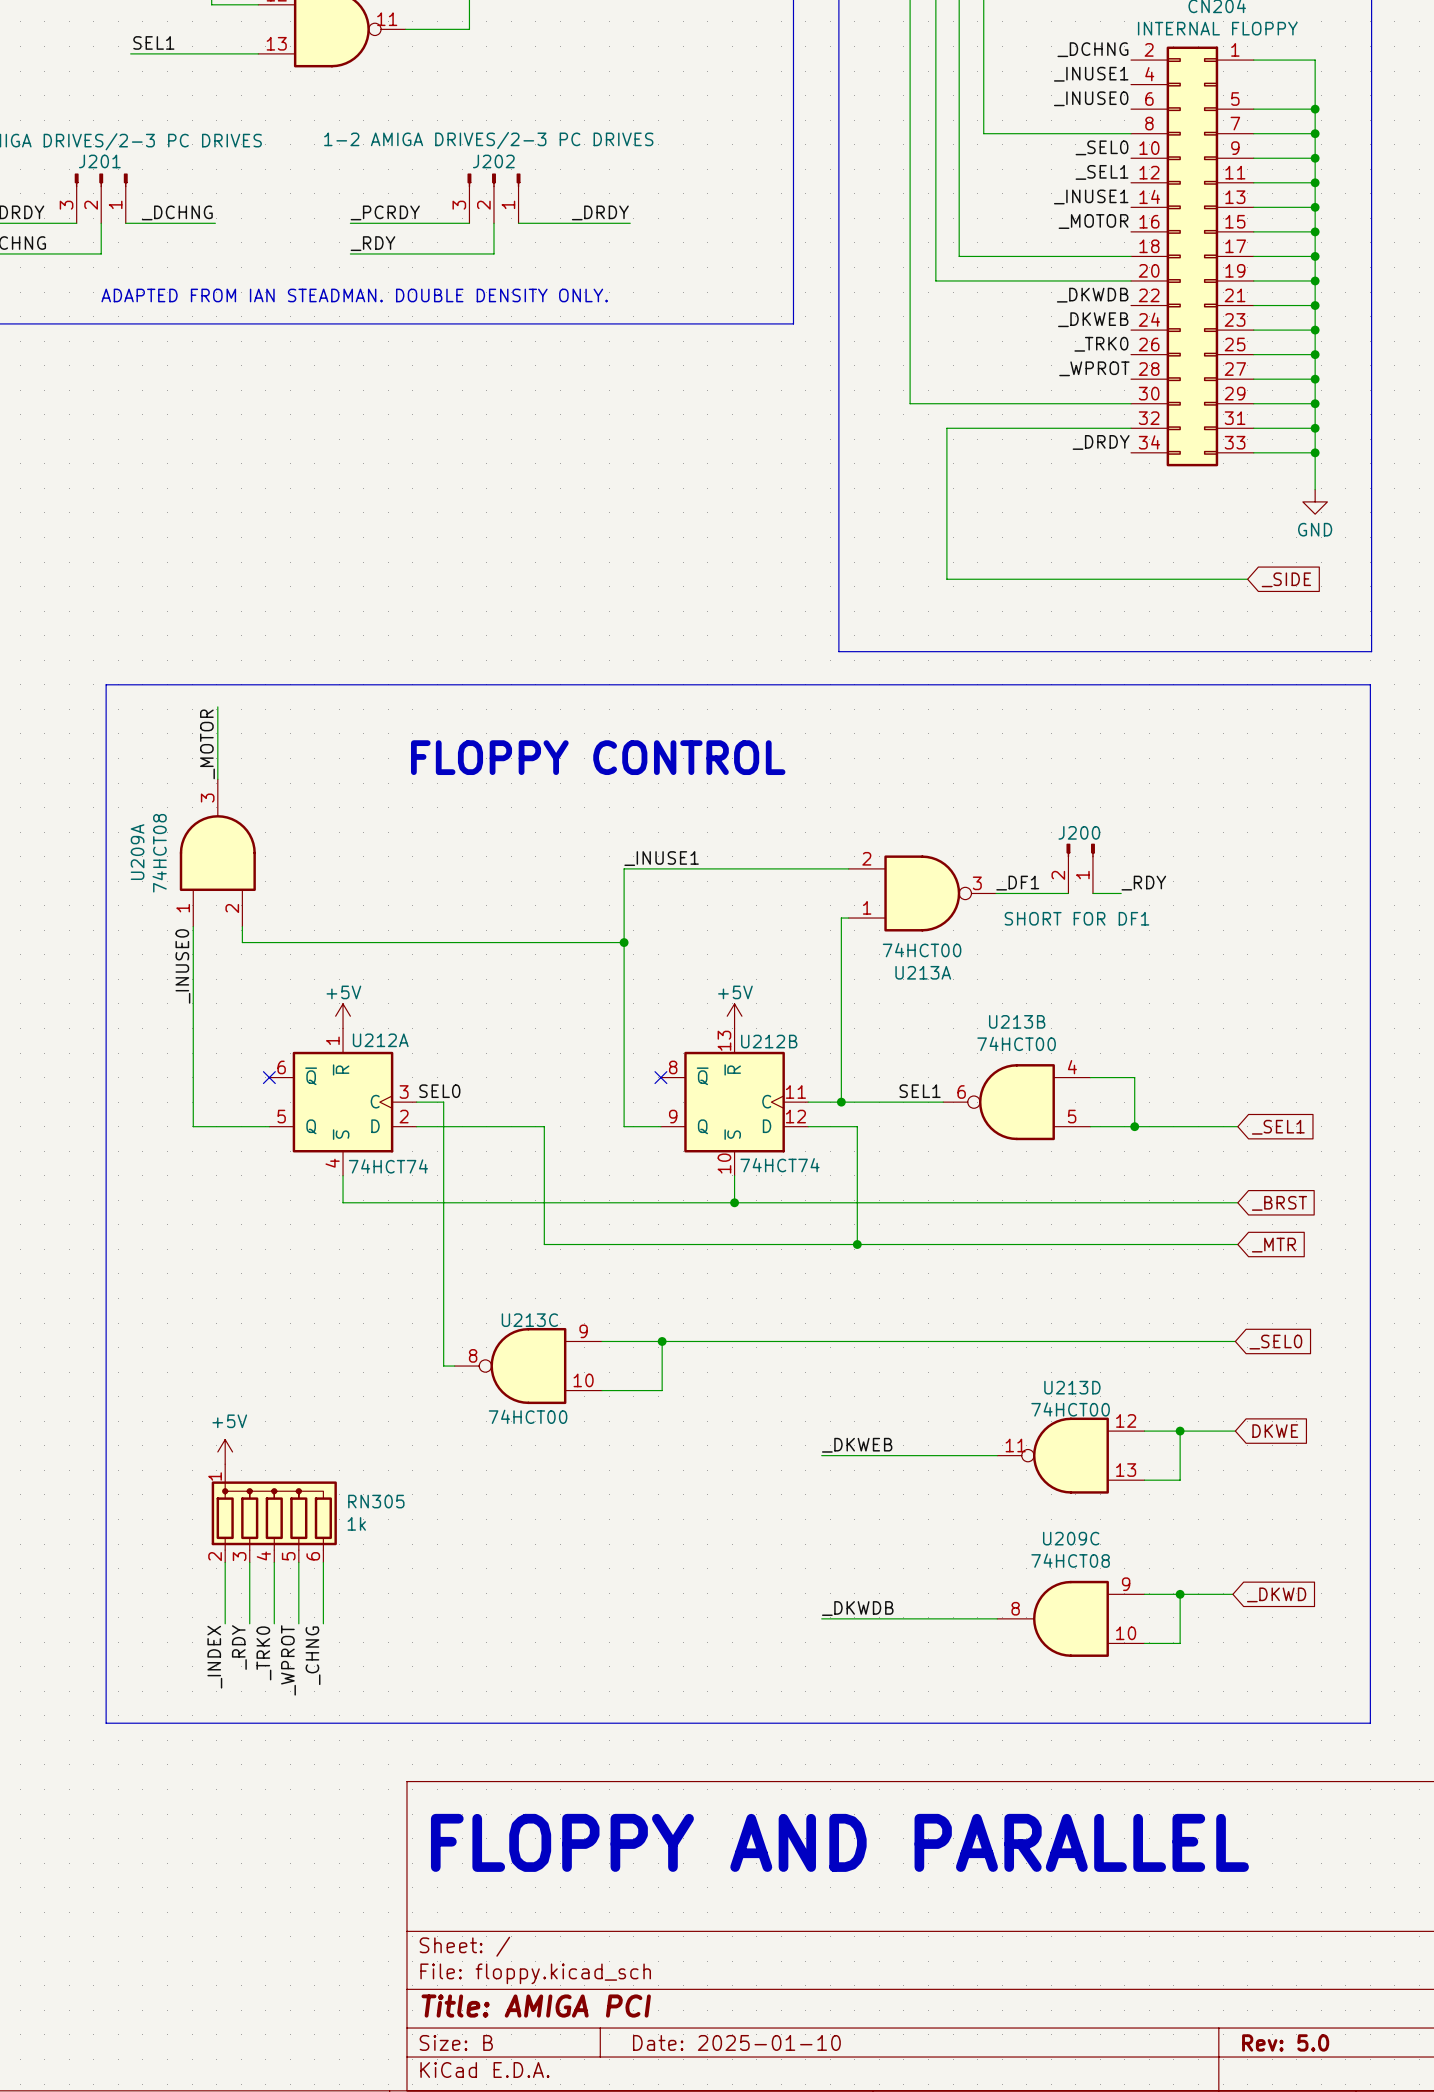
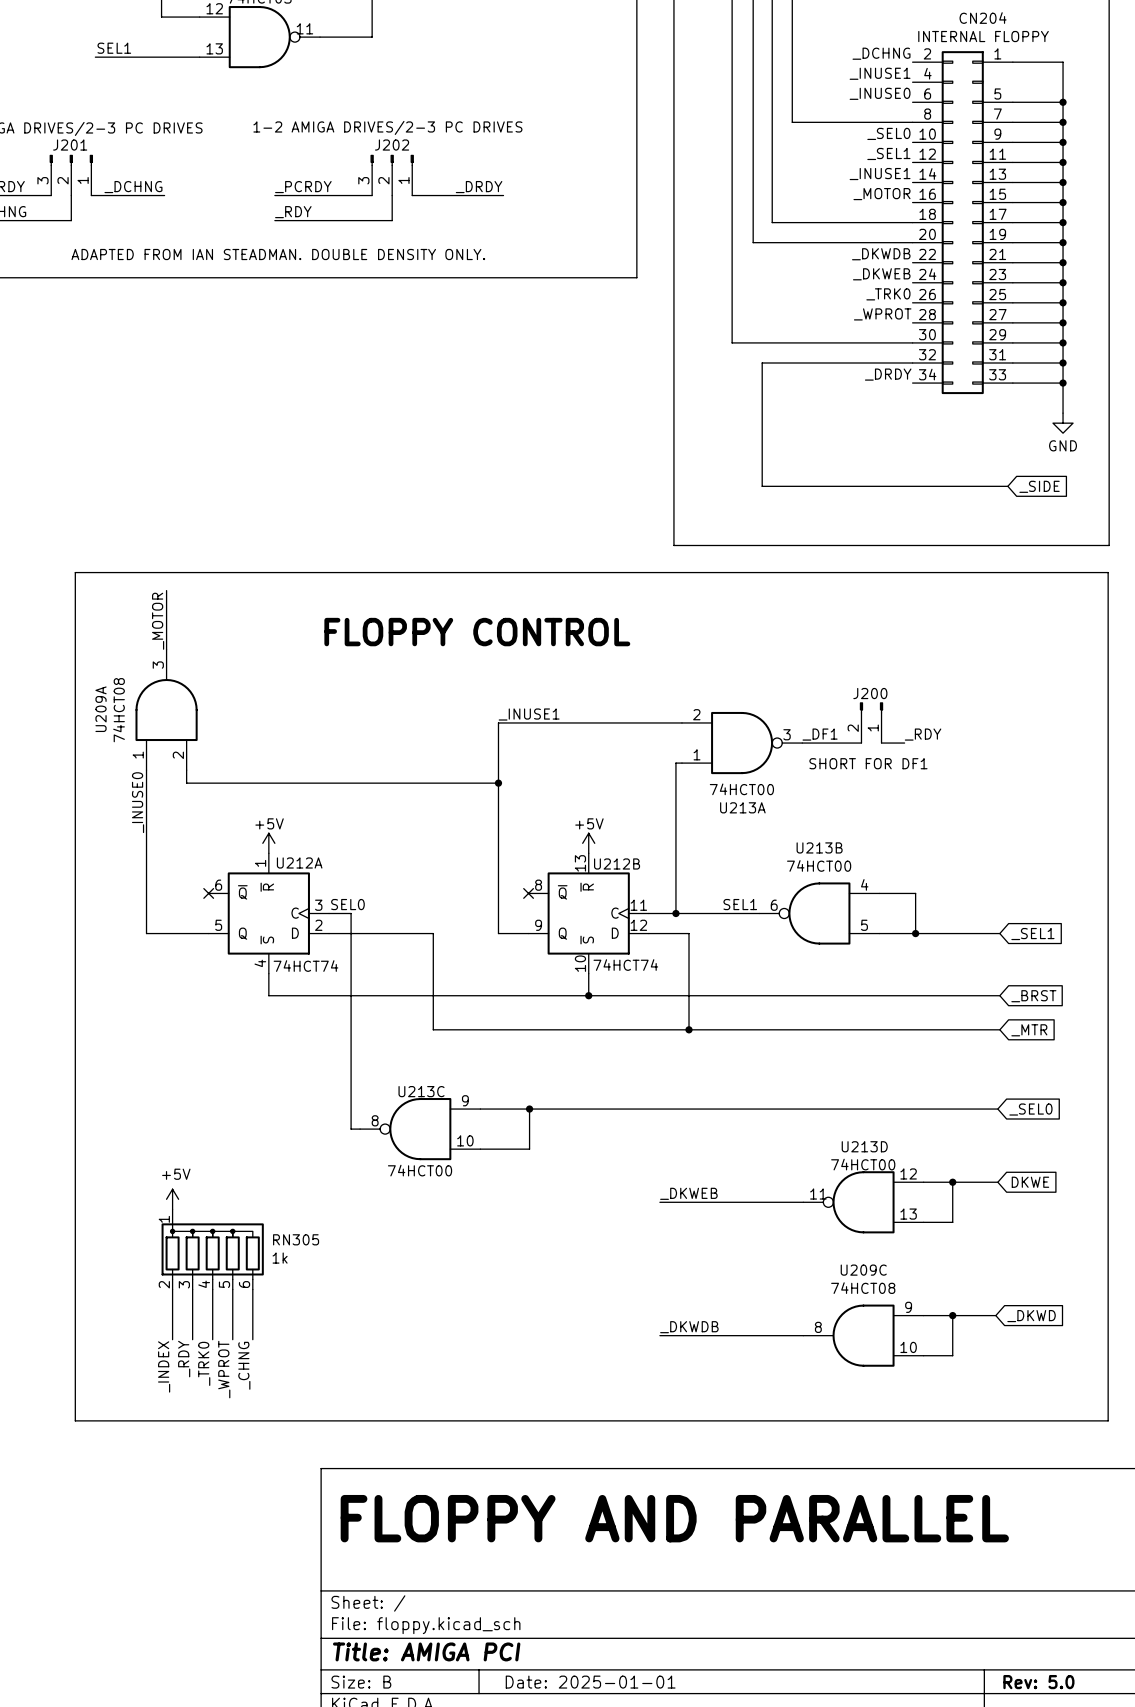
title block: Date: 2025-01-10 (736, 2042) -> Date: 2025-01-01 (590, 1682)

